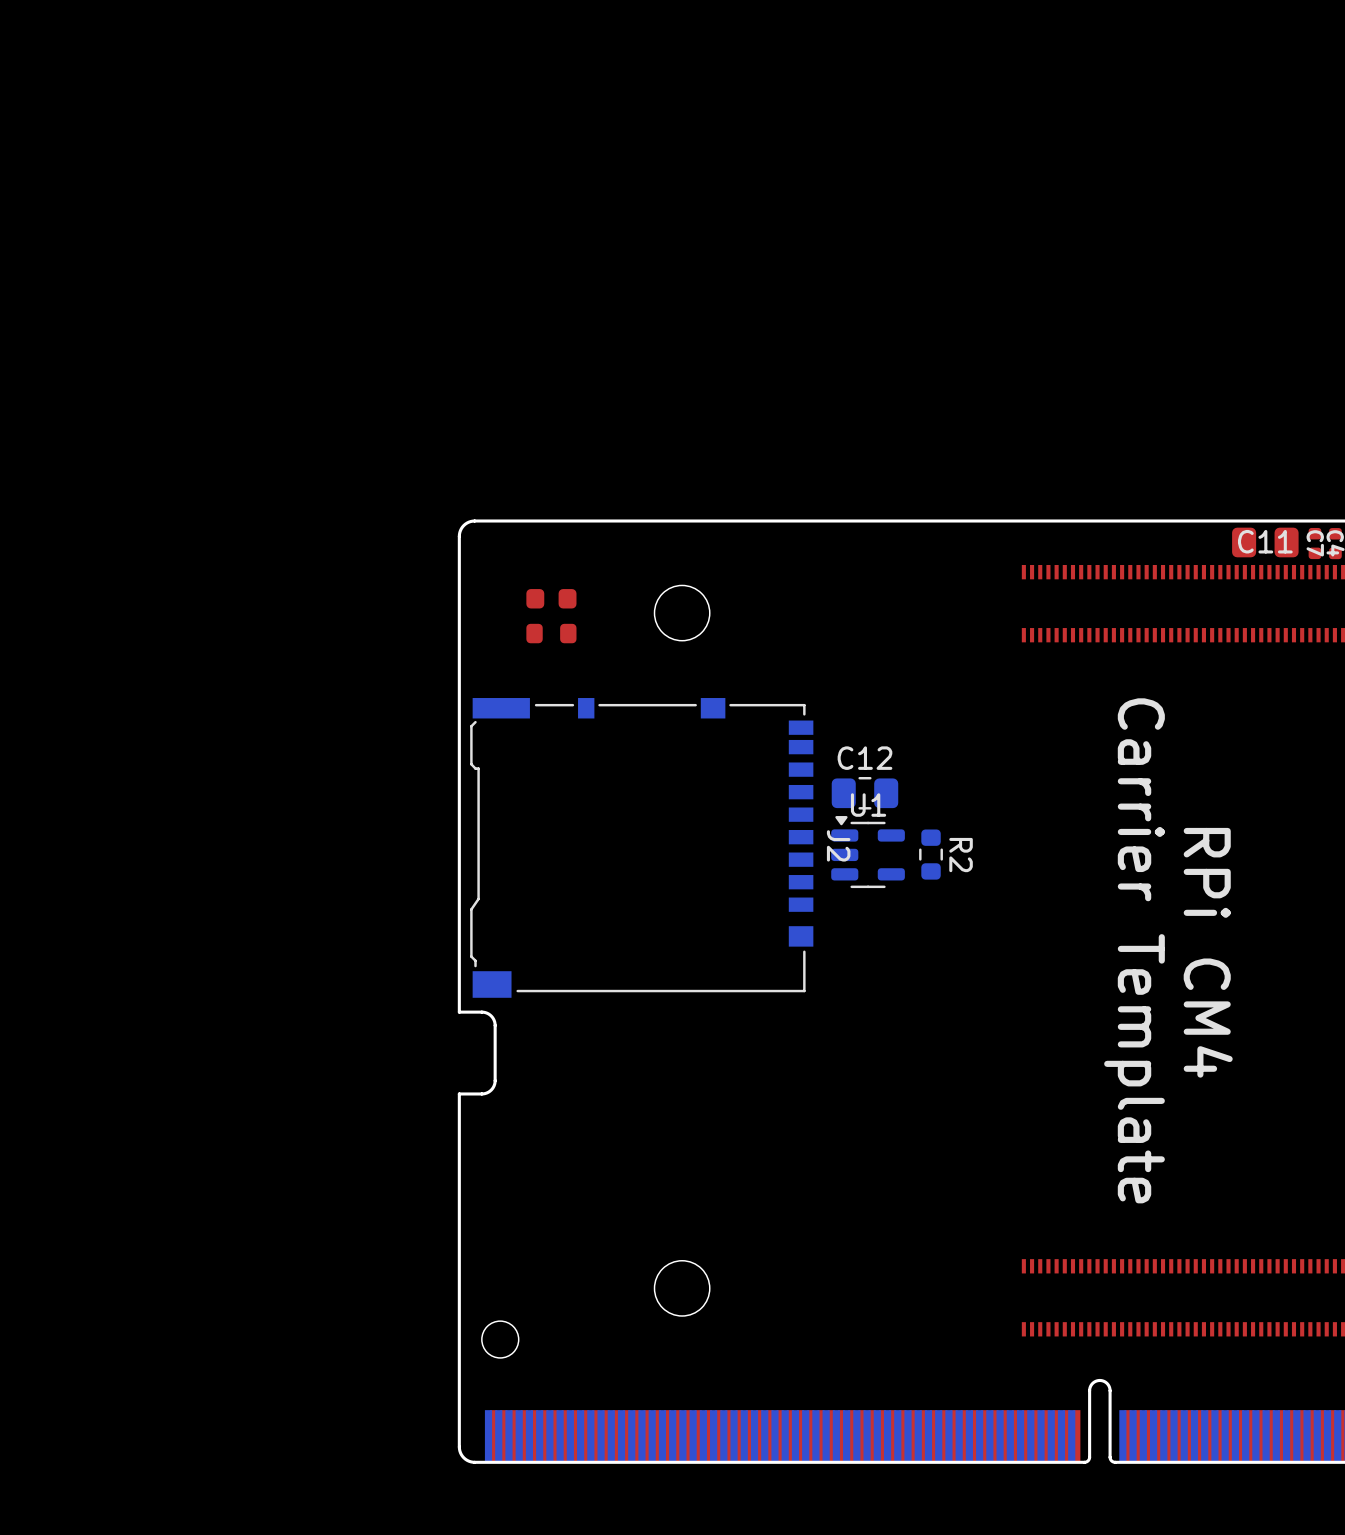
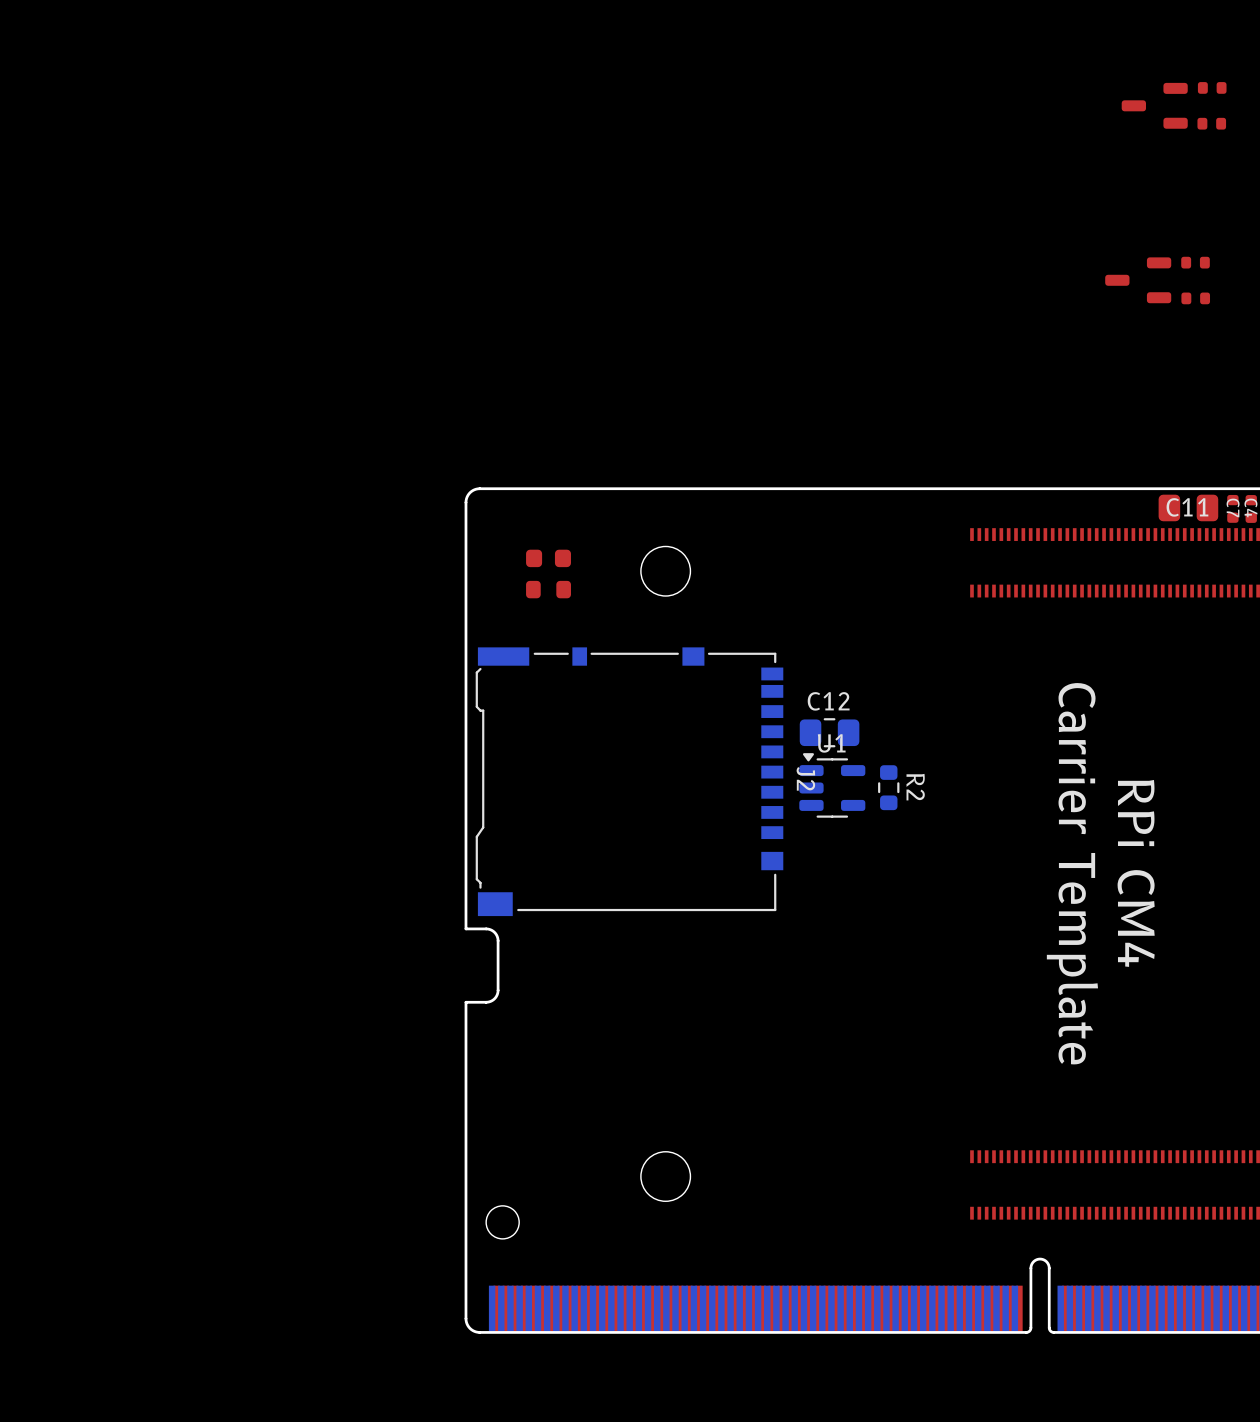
part: none -> (1212, 87)
part: none -> (1154, 105)
part: none -> (1211, 123)
part: none -> (1195, 262)
part: none -> (1138, 280)
part: none -> (1195, 298)

